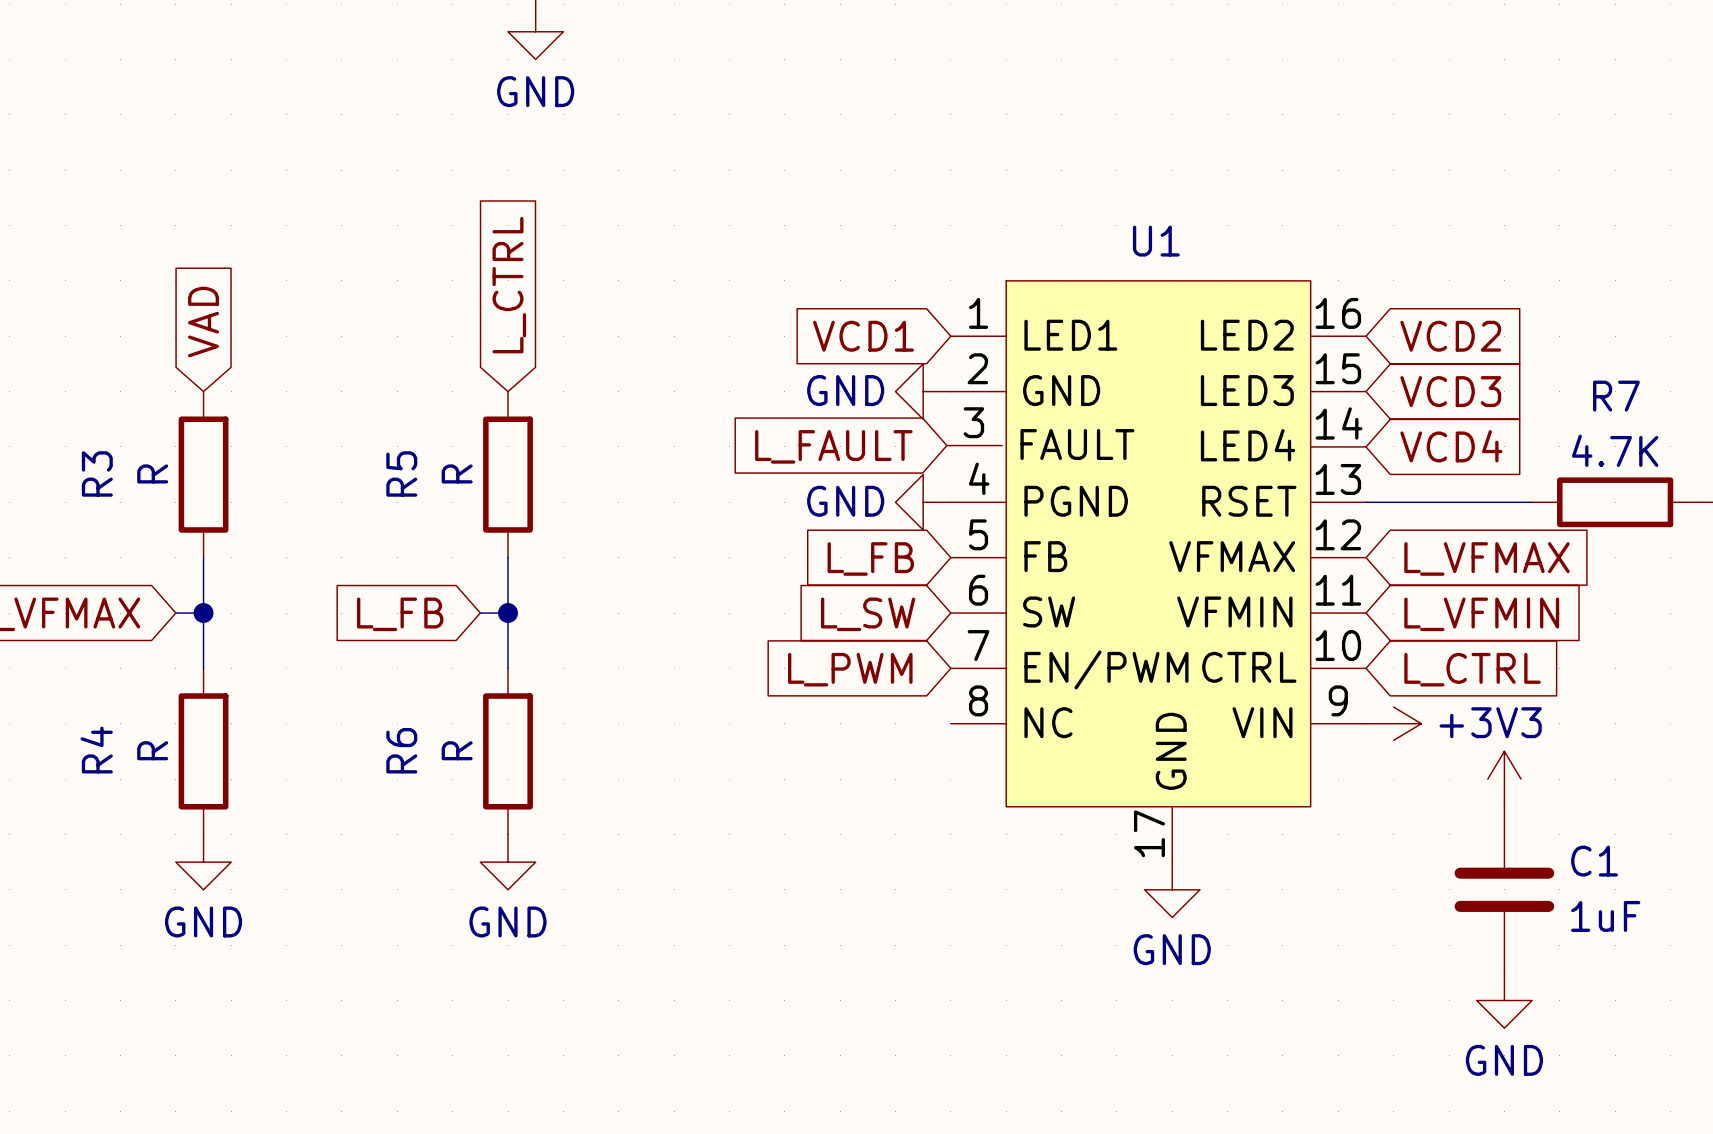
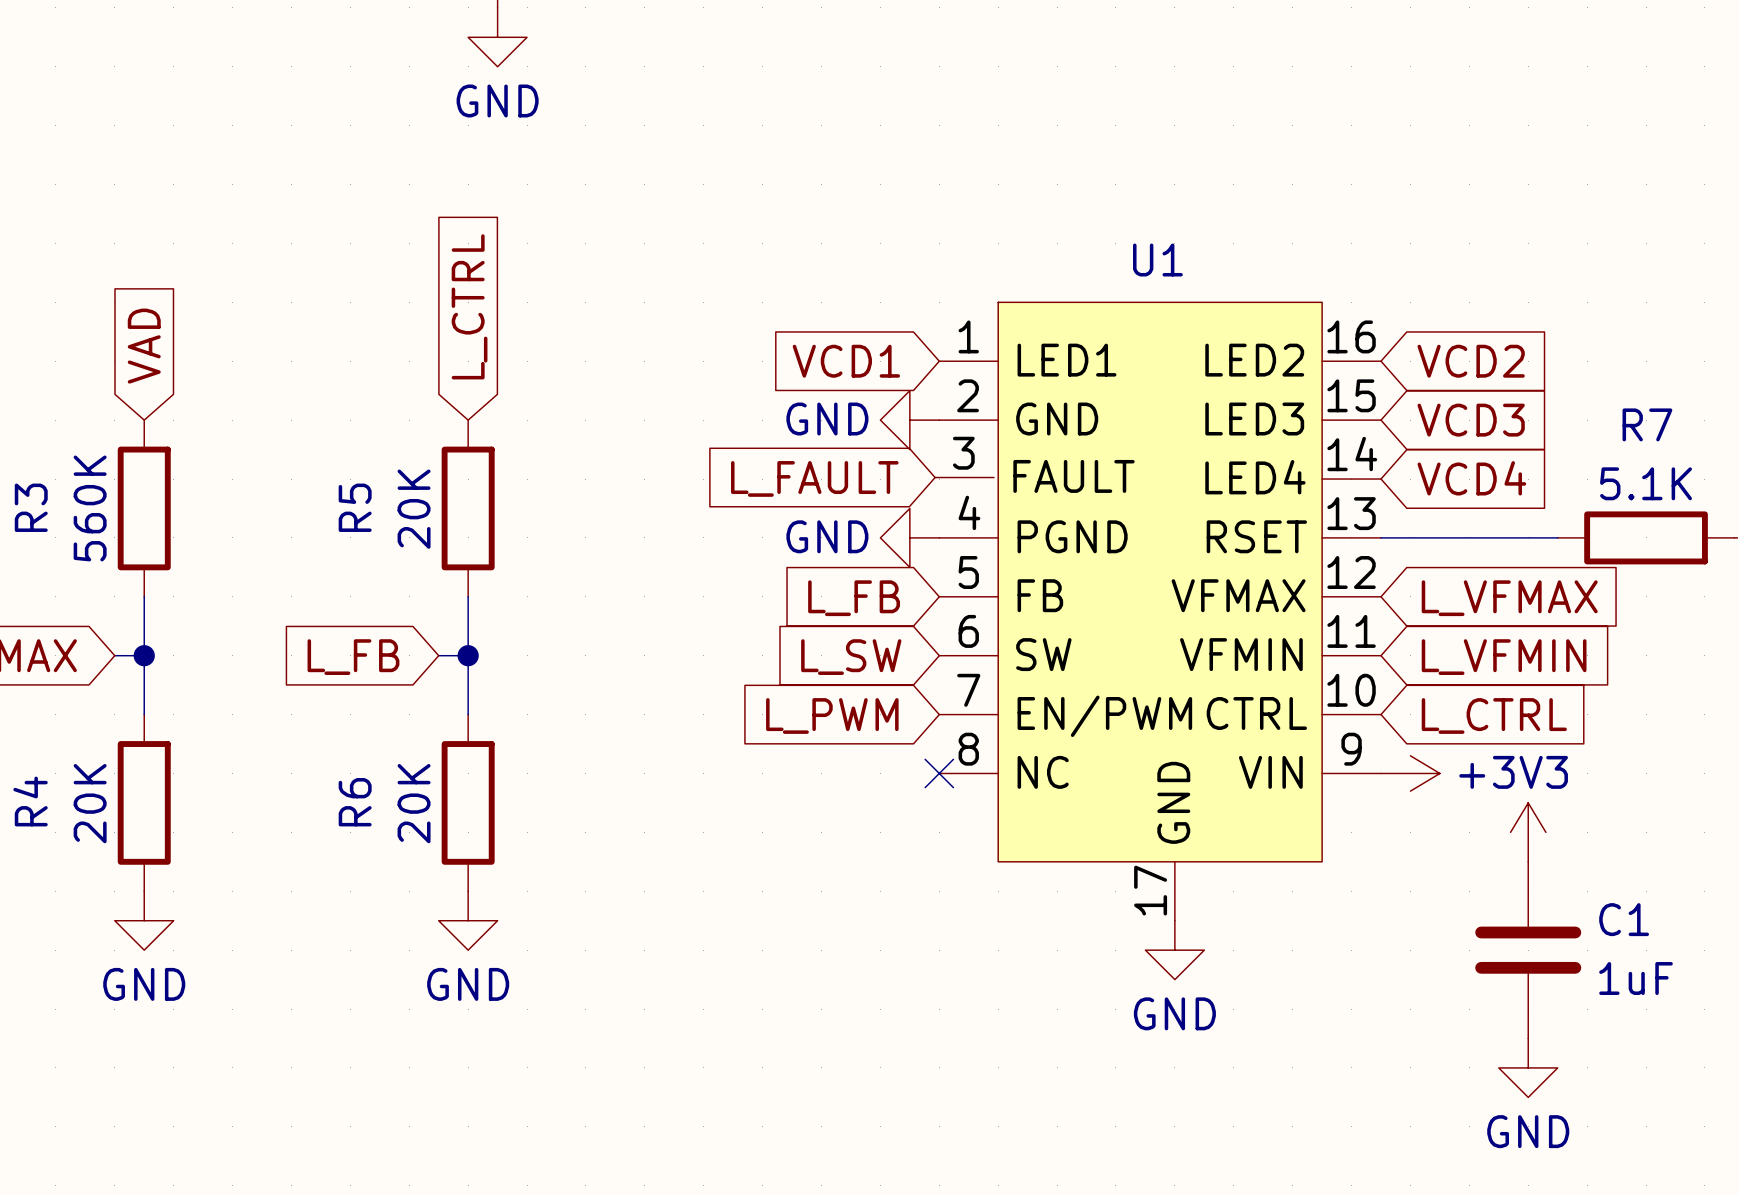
R7 value: 4.7K (1615, 450) -> 5.1K (1646, 483)
R3 value: R (152, 473) -> 560K (90, 508)
R5 value: R (457, 473) -> 20K (414, 509)
no-connect mark: none -> (939, 773)
R4 value: R (152, 750) -> 20K (90, 803)
R6 value: R (457, 750) -> 20K (414, 803)

